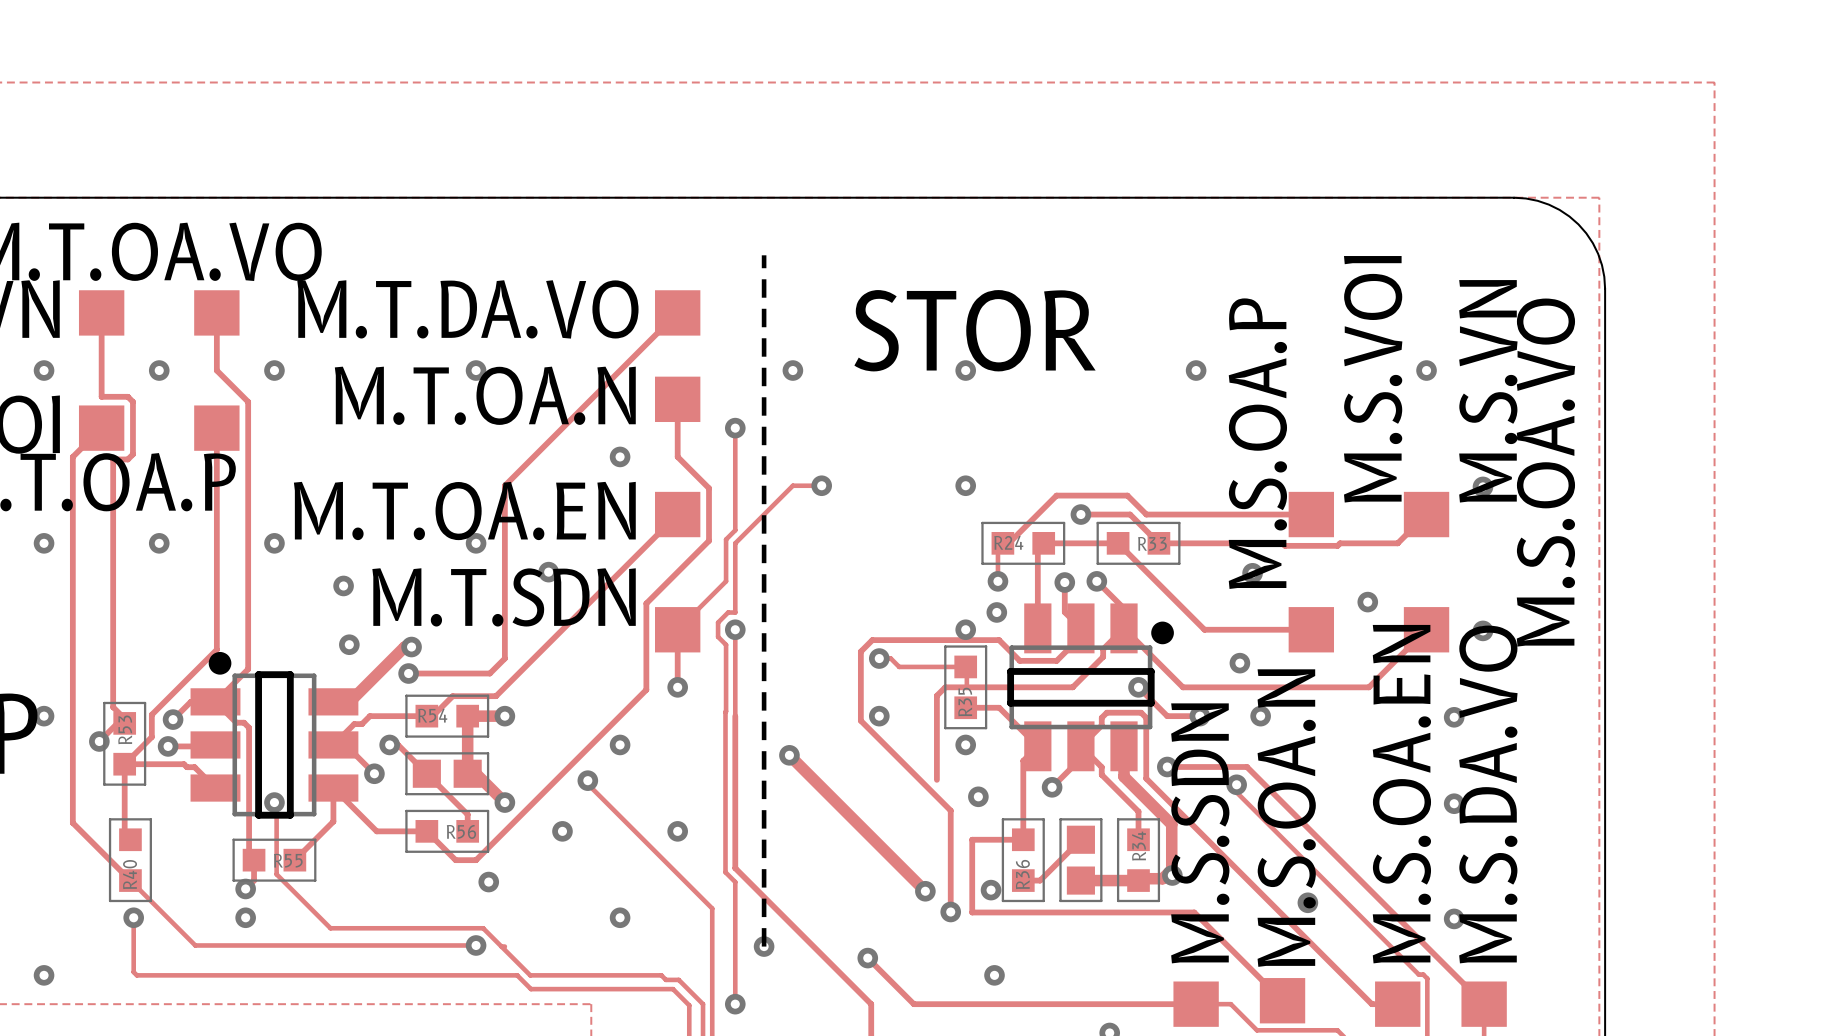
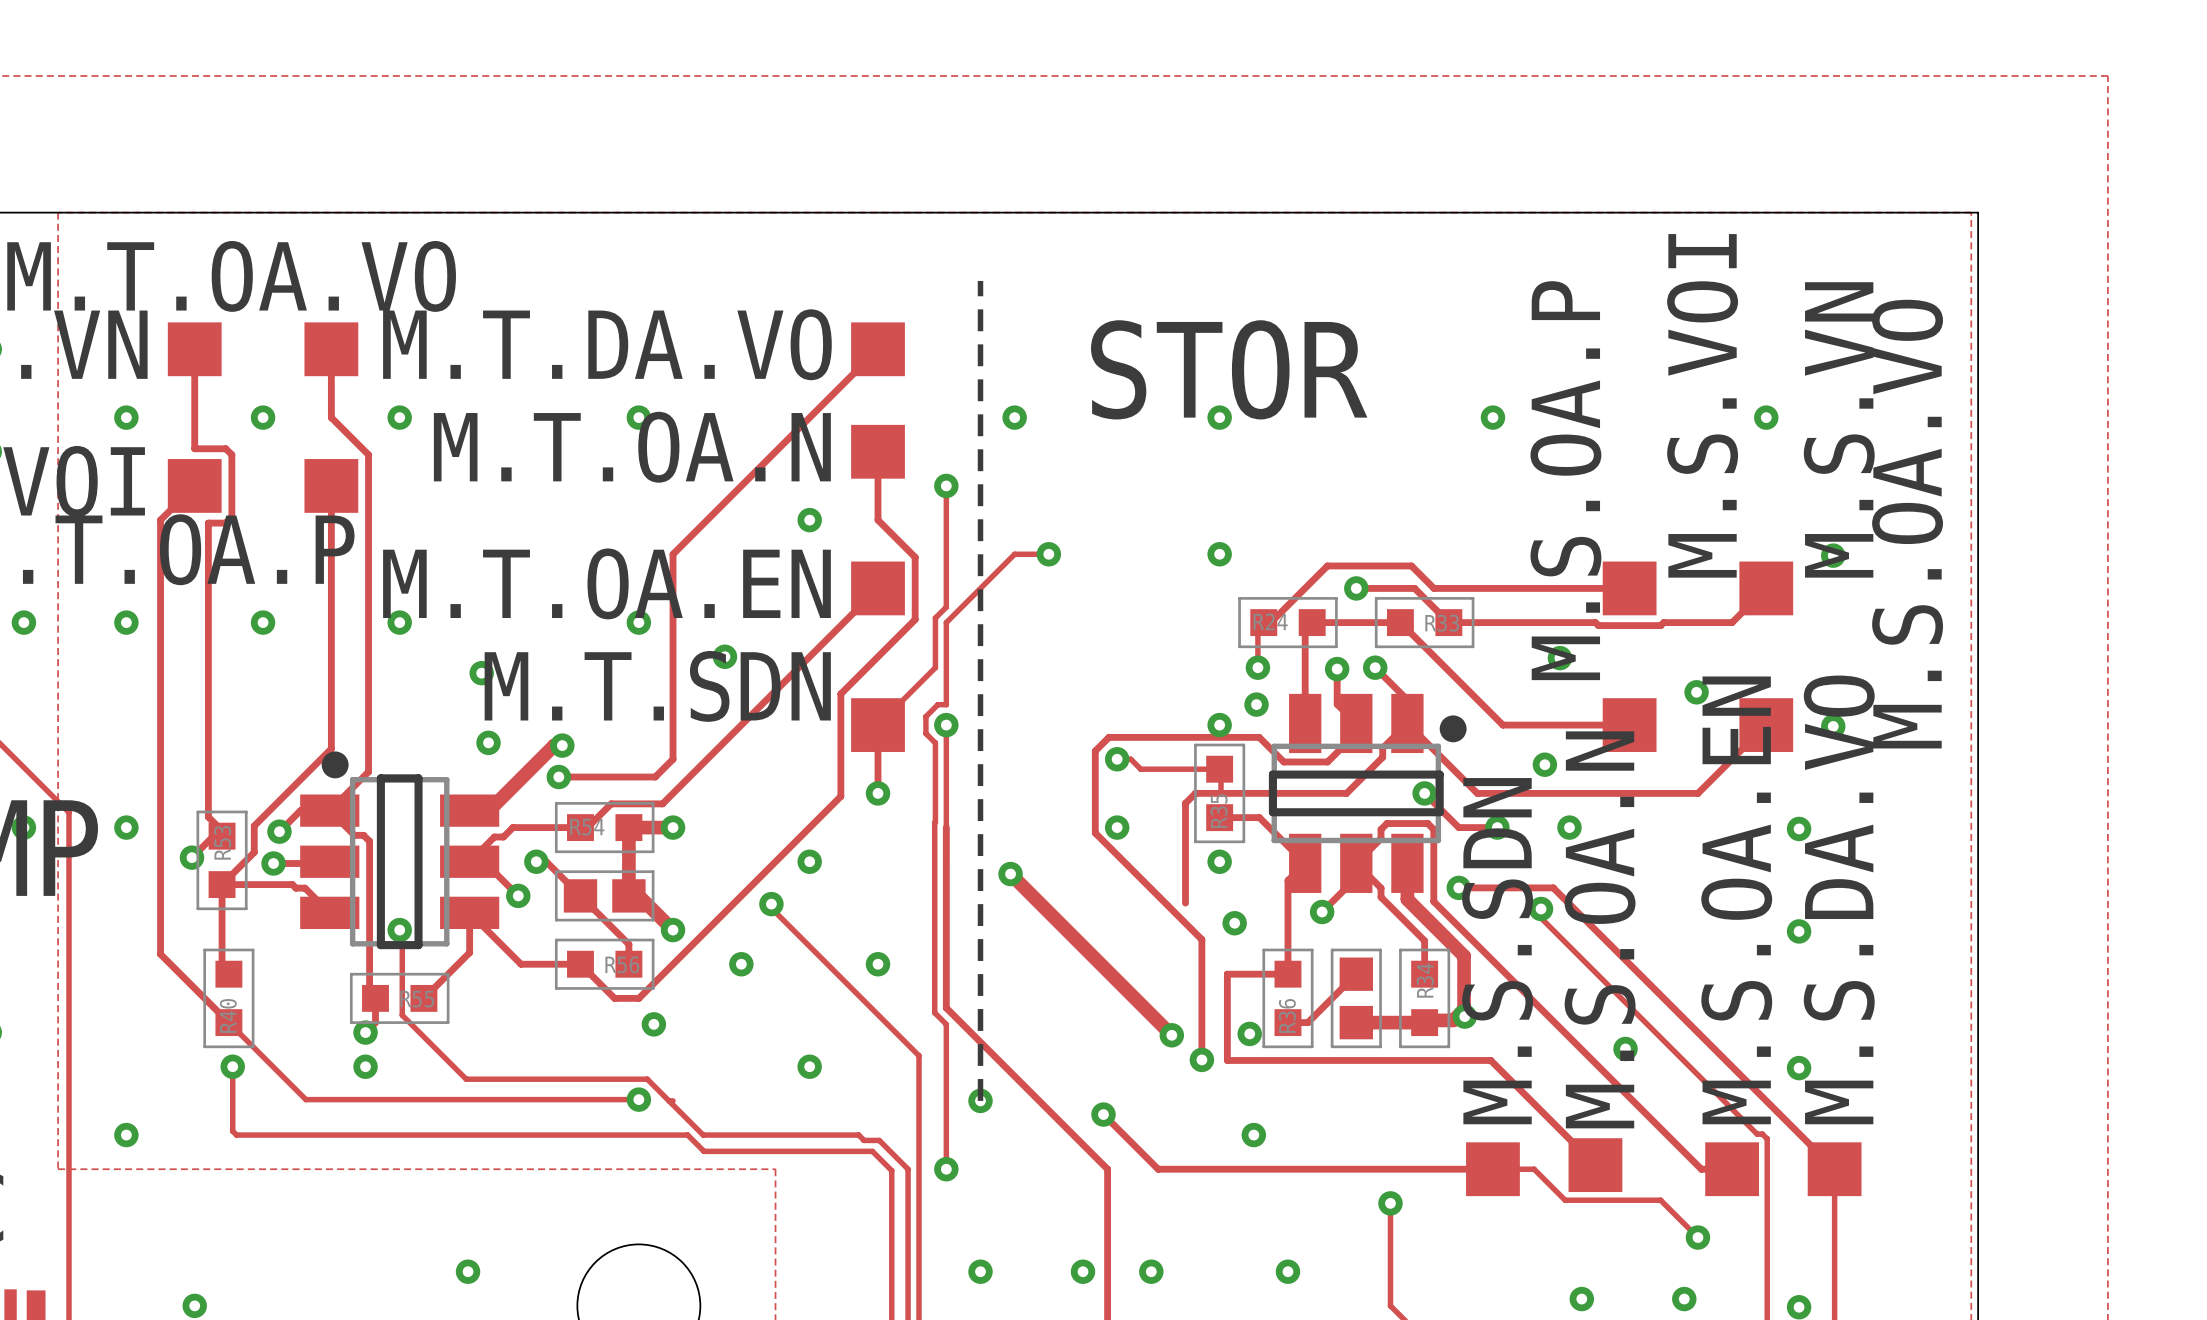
board edge: (1514, 197) (1525, 198) (1548, 204) (1559, 209) (1578, 224) (1592, 243) (1598, 253) (1604, 276) (1605, 288) -> (1870, 212) (1978, 212) (1978, 320)

